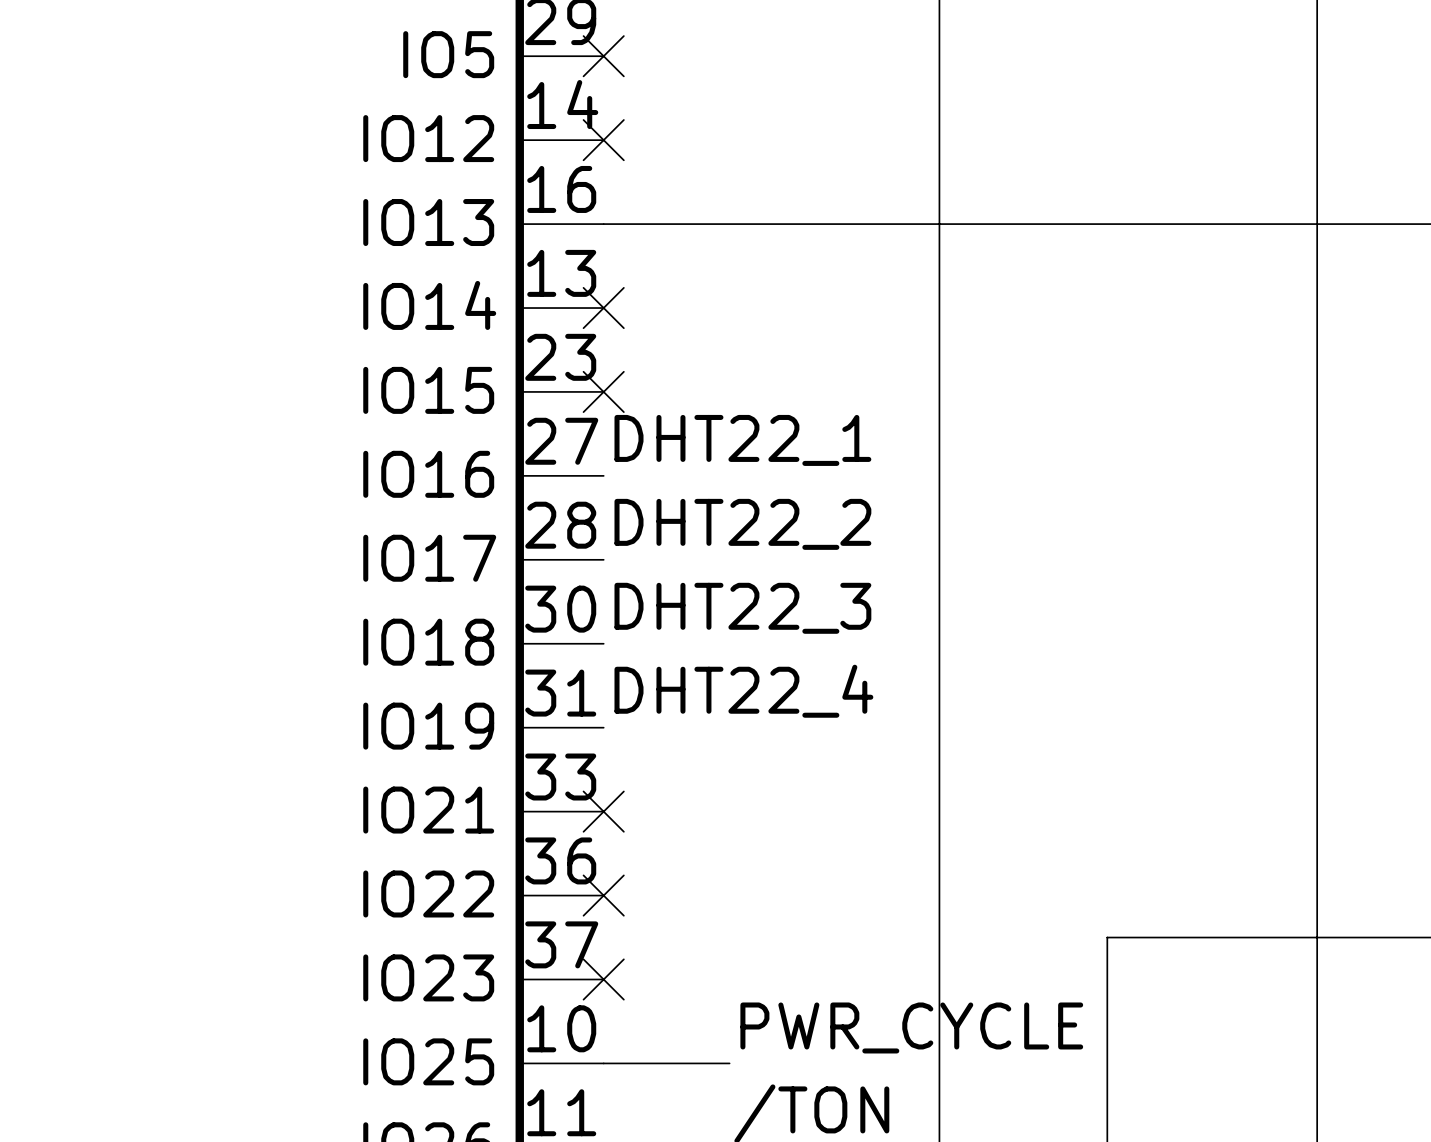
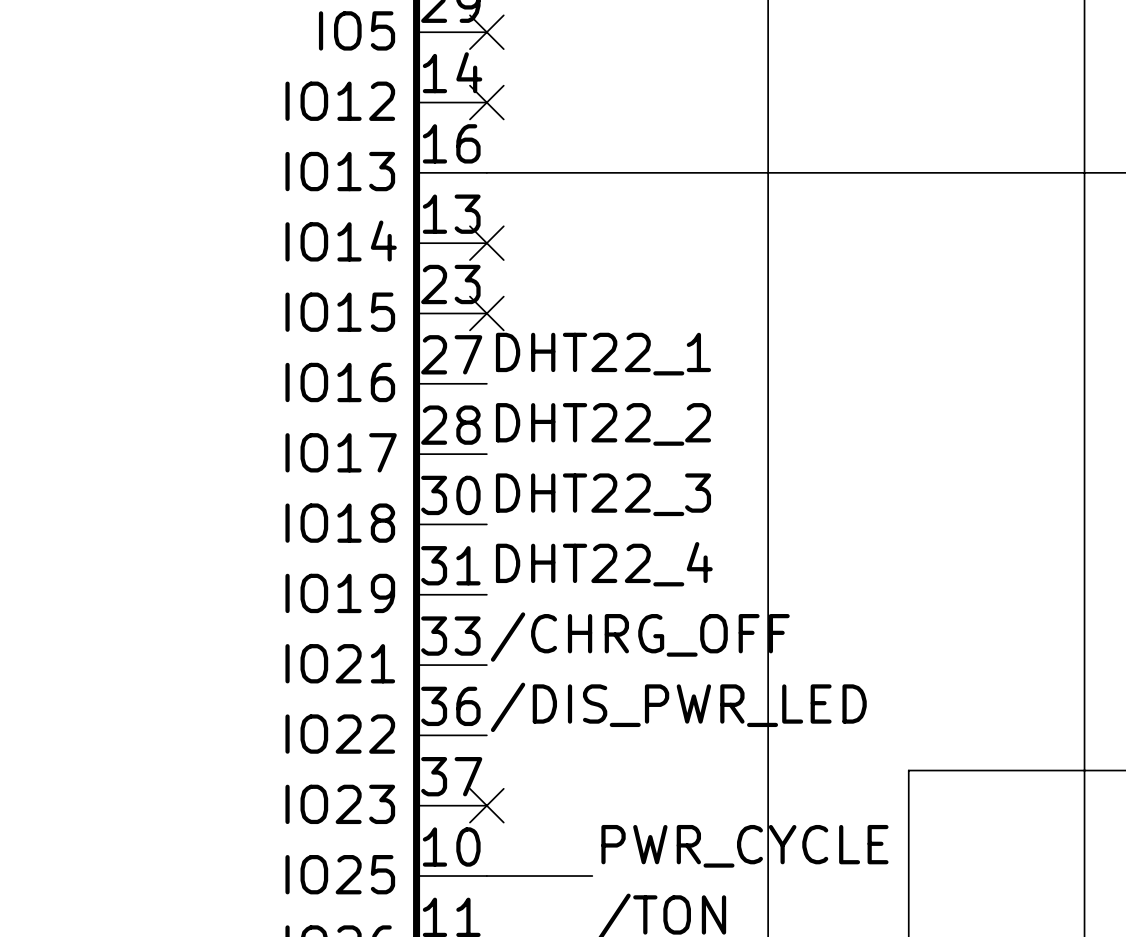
label: none -> /CHRG_OFF (640, 637)
no-connect mark: (603, 811) -> none
label: none -> /DIS_PWR_LED (678, 707)
no-connect mark: (603, 895) -> none

